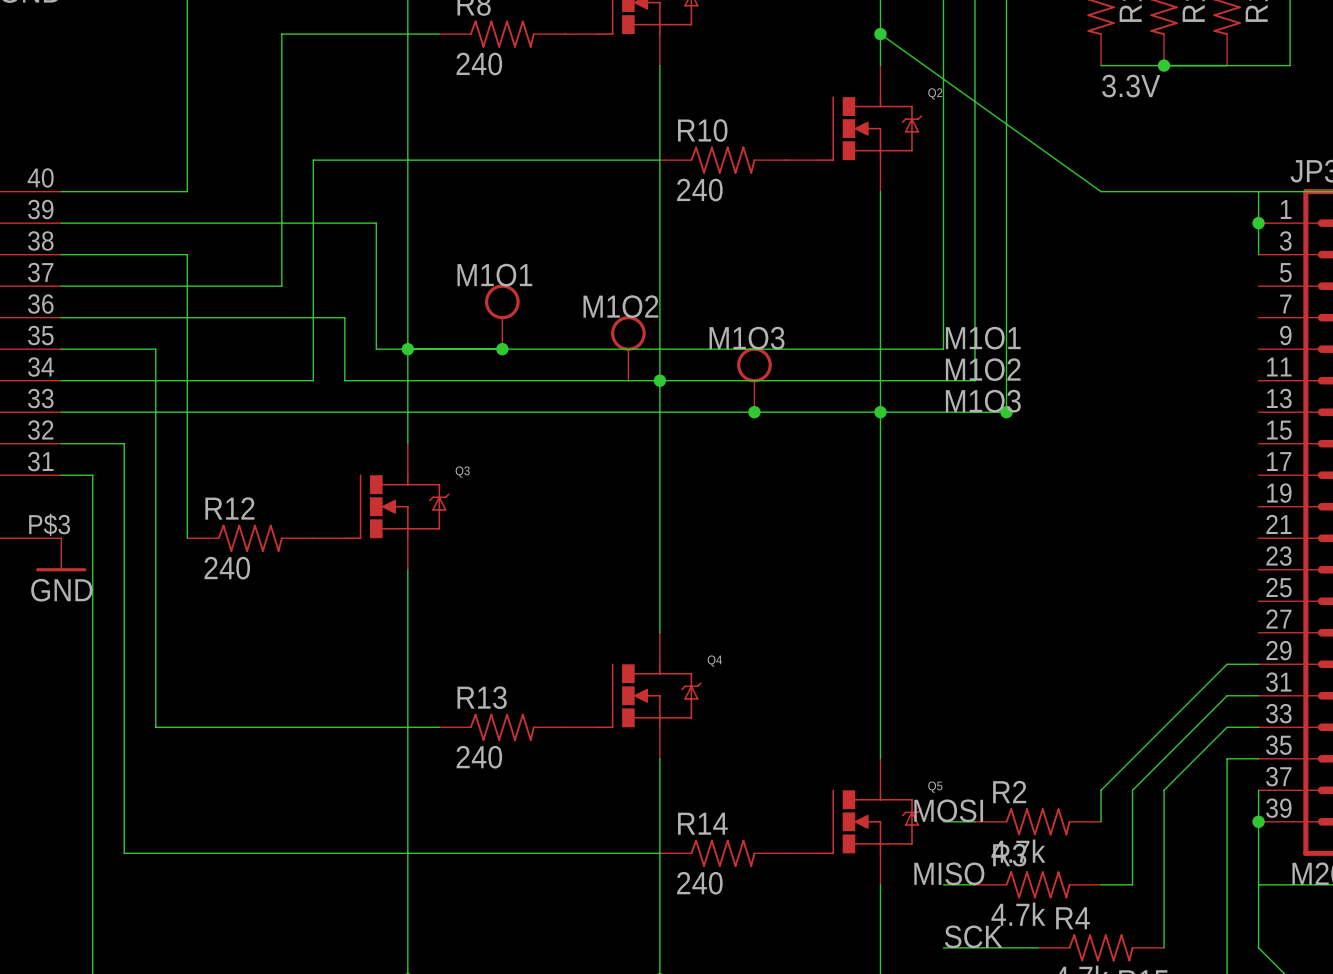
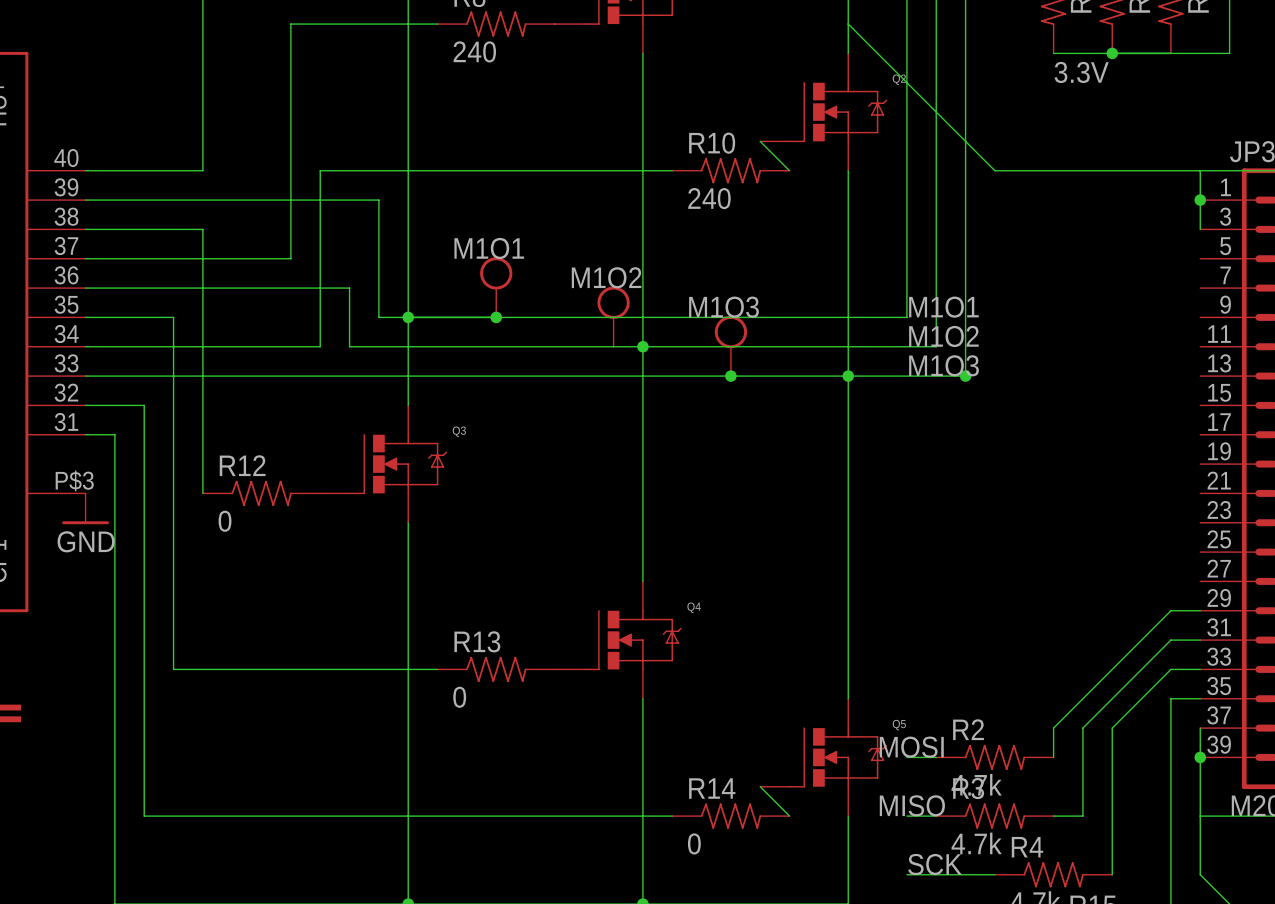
wire: (880, 34) (1101, 191) -> (848, 24) (994, 170) (1053, 170)
junction: (880, 34) -> none
wire: (659, 160) (313, 160) (313, 191) -> (672, 170) (320, 170)
R10 position: (722, 160) -> (730, 170)
wire: none -> (760, 141) (789, 170)
R12 value: 240 (227, 568) -> 0 (225, 521)
R13 value: 240 (479, 757) -> 0 (459, 697)
wire: (124, 853) (659, 853) -> (144, 786) (144, 816) (672, 816)
R14 position: (722, 853) -> (730, 816)
wire: none -> (760, 786) (789, 816)
R14 value: 240 (699, 883) -> 0 (694, 843)

